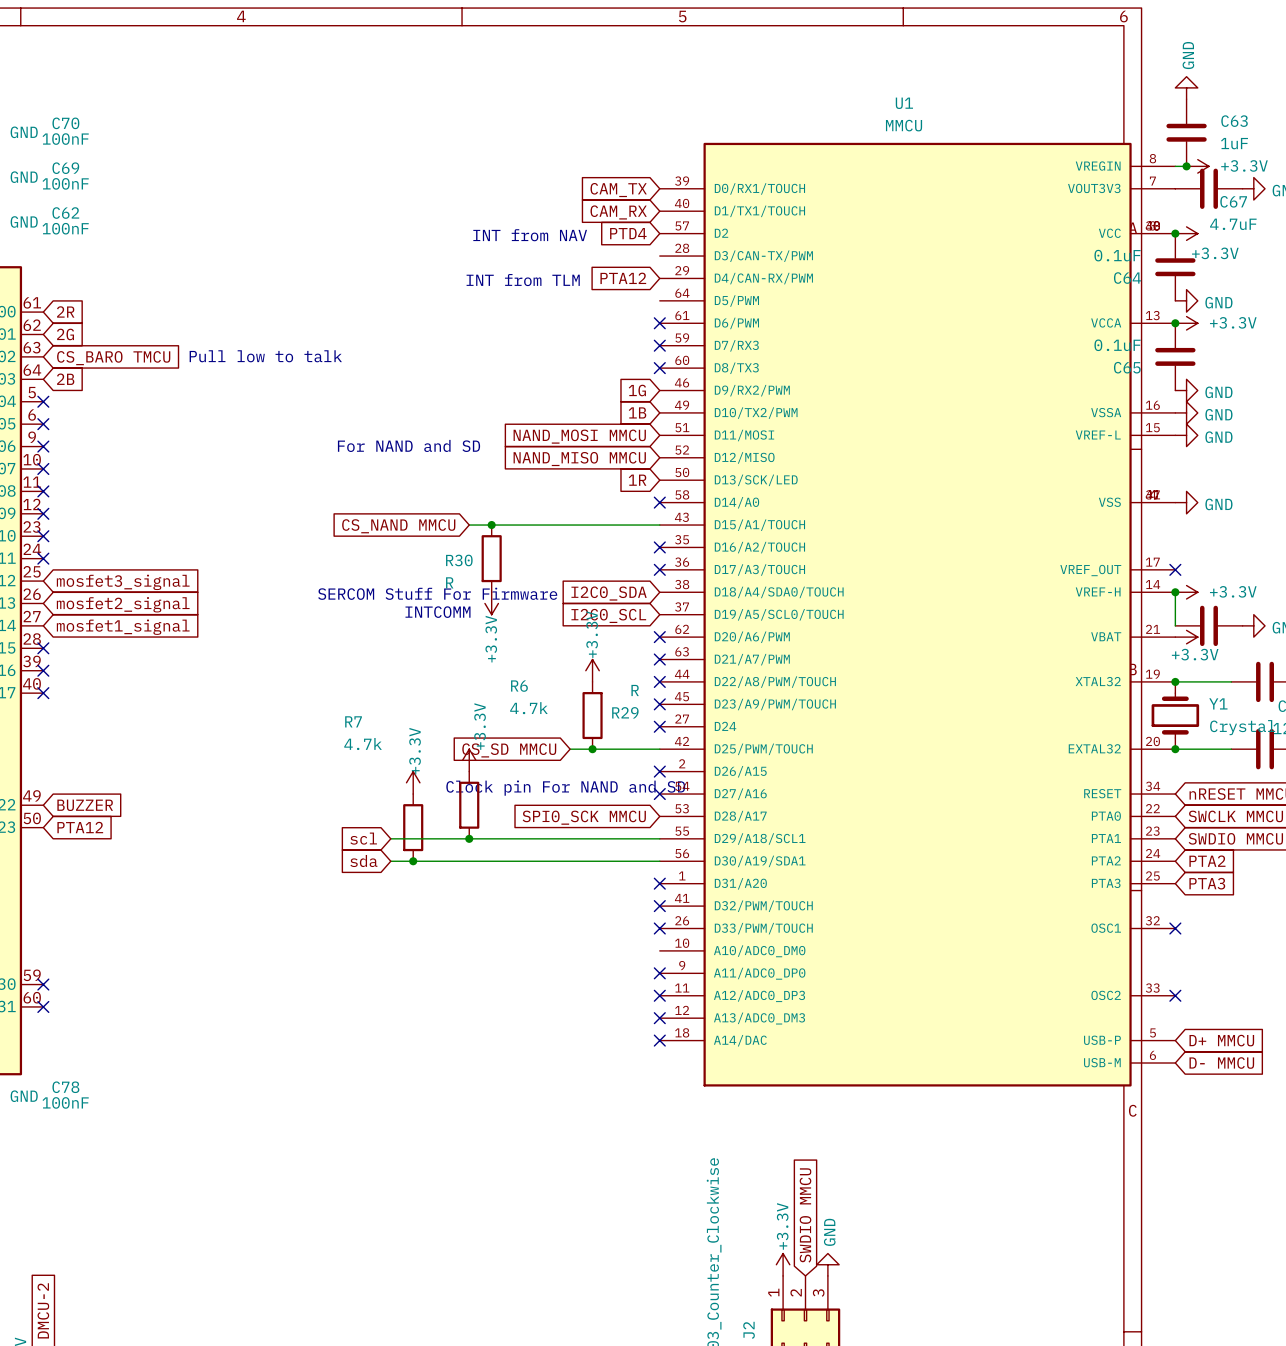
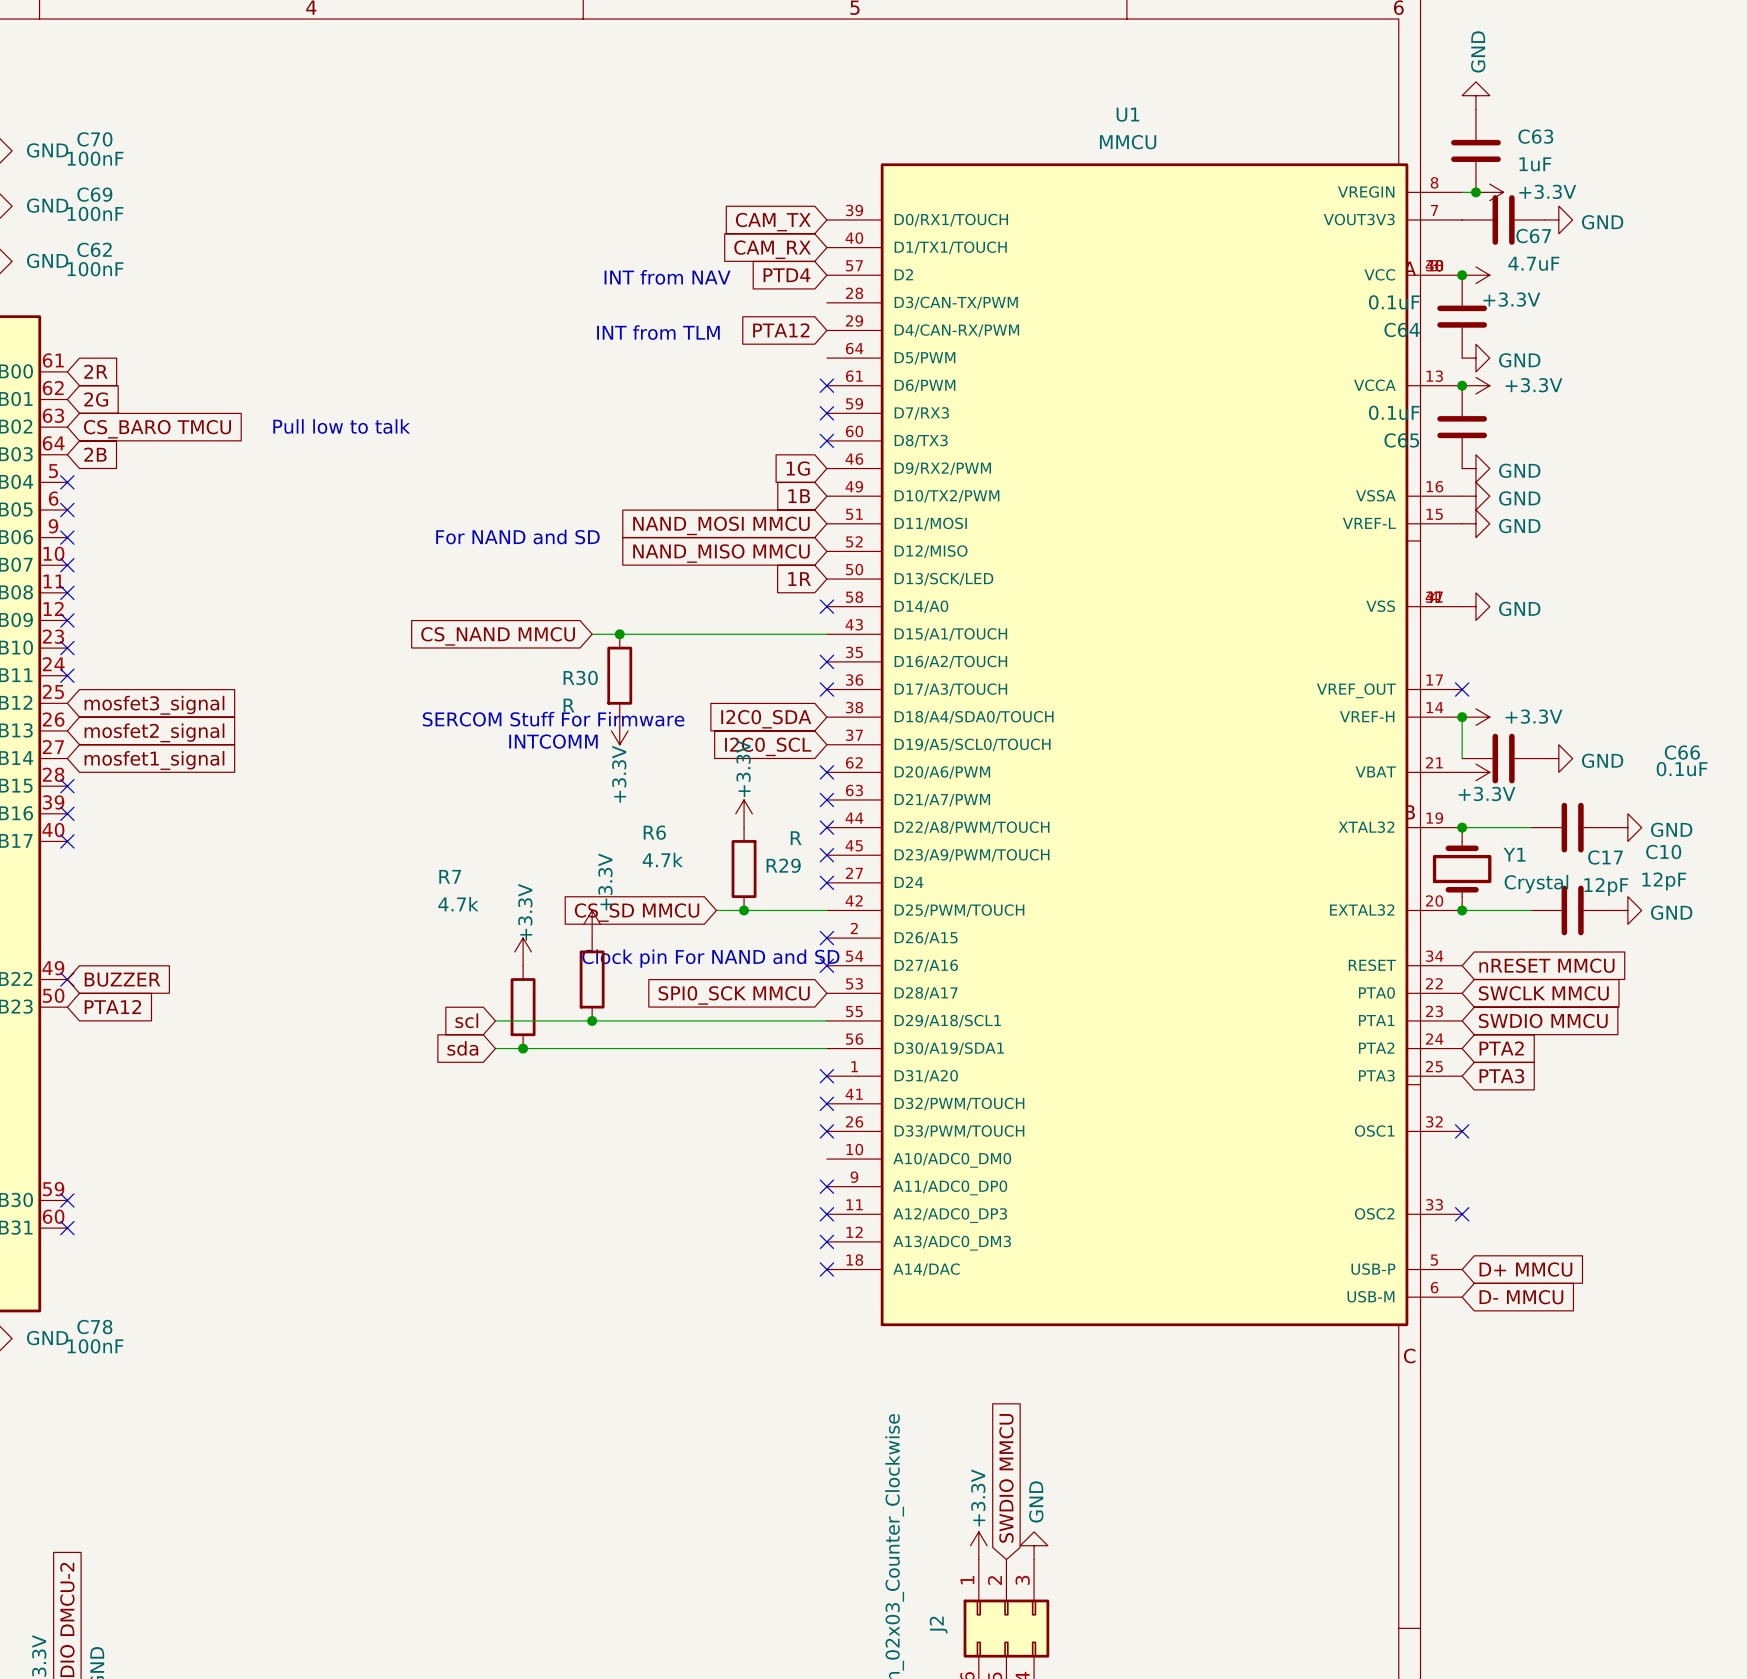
no-connect mark: none -> (67, 979)

